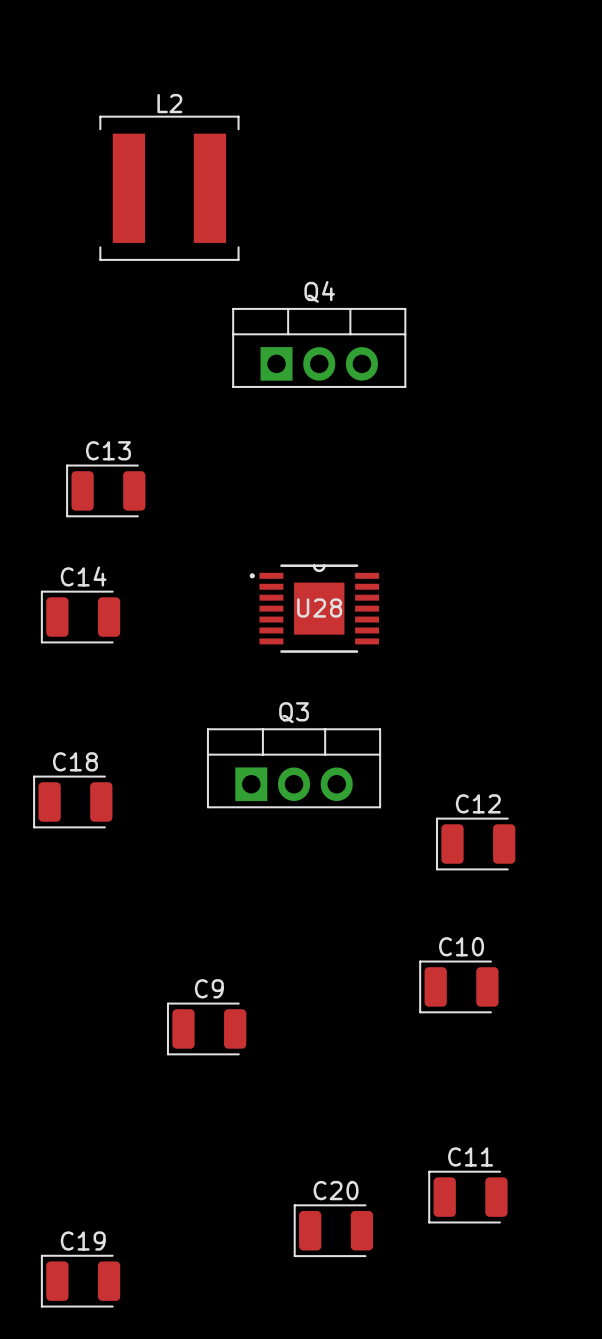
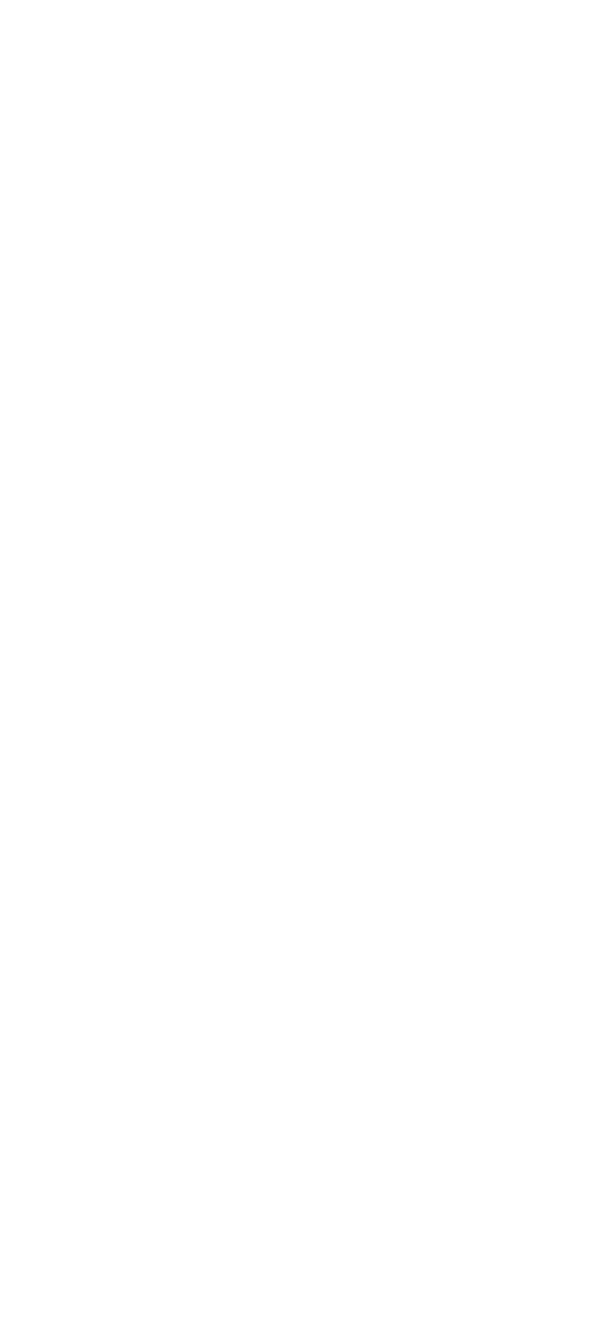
L2: (169, 188) -> none
Q4: (319, 347) -> none
C13: (105, 490) -> none
U28: (314, 608) -> none
C14: (80, 617) -> none
Q3: (294, 768) -> none
C18: (72, 801) -> none
C12: (475, 844) -> none
C10: (458, 986) -> none
C9: (206, 1028) -> none
C11: (467, 1197) -> none
C20: (333, 1230) -> none
C19: (80, 1281) -> none

